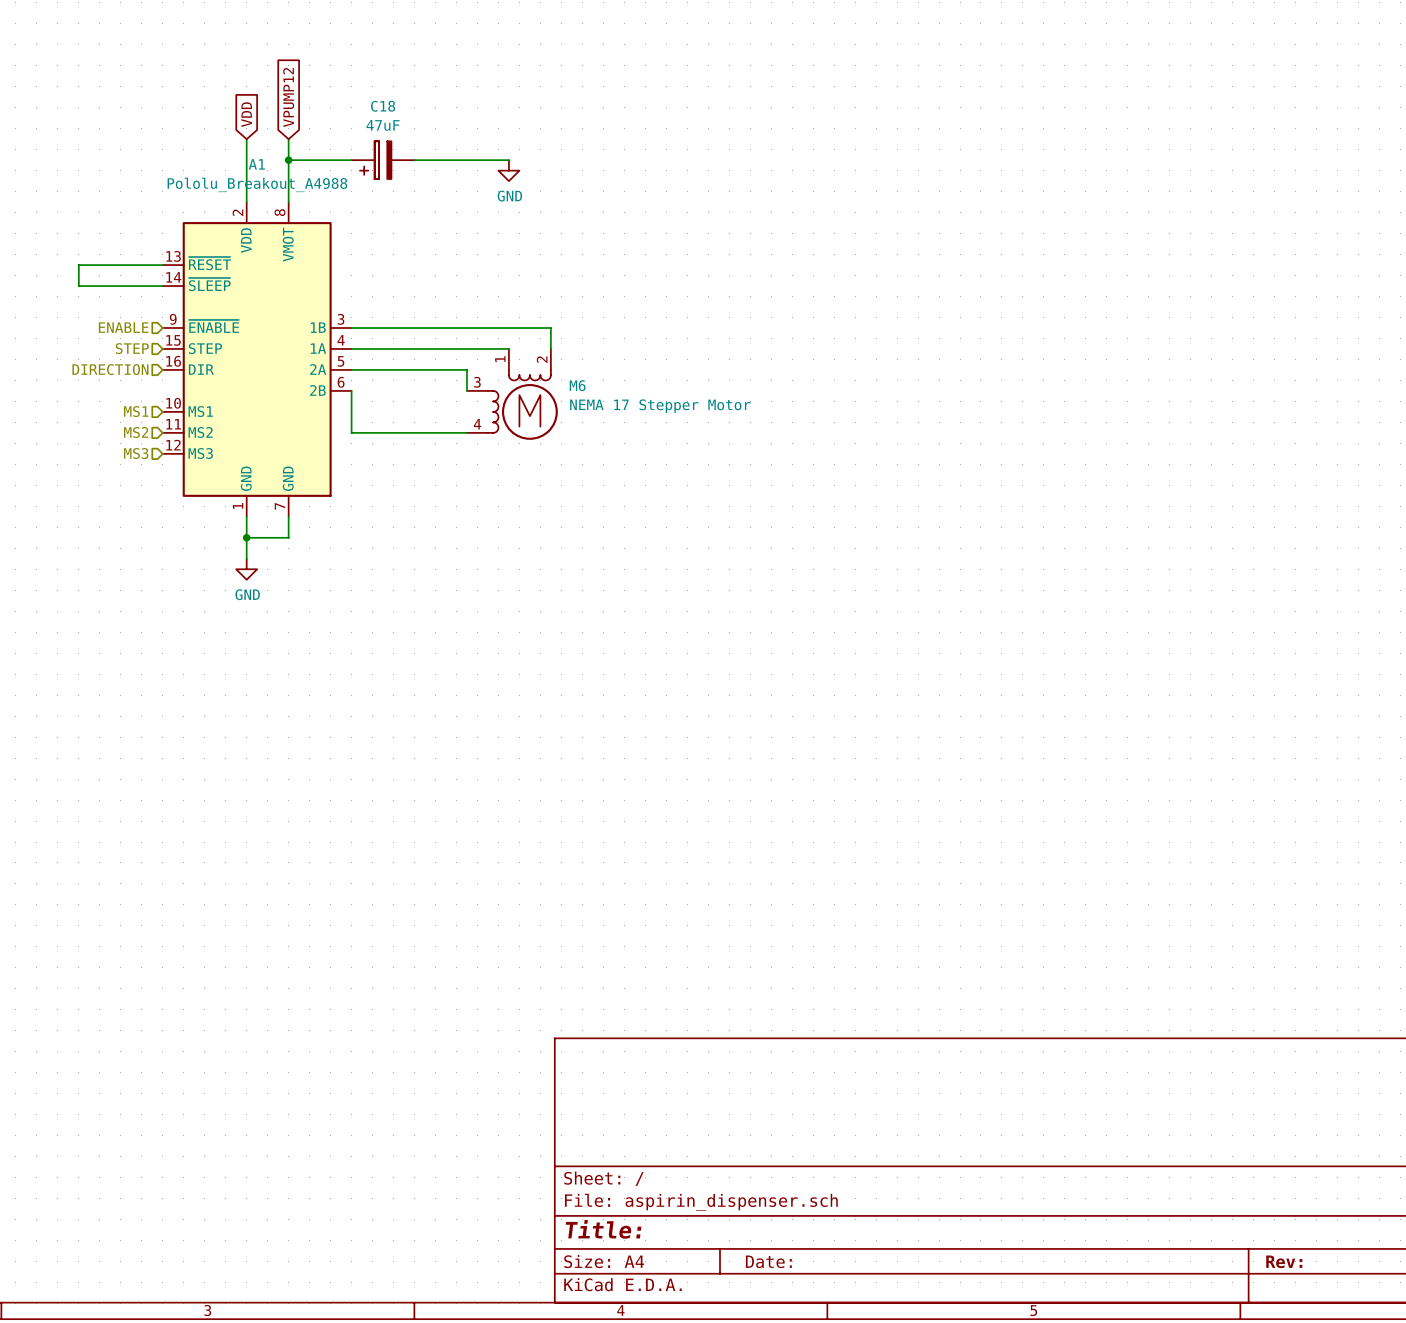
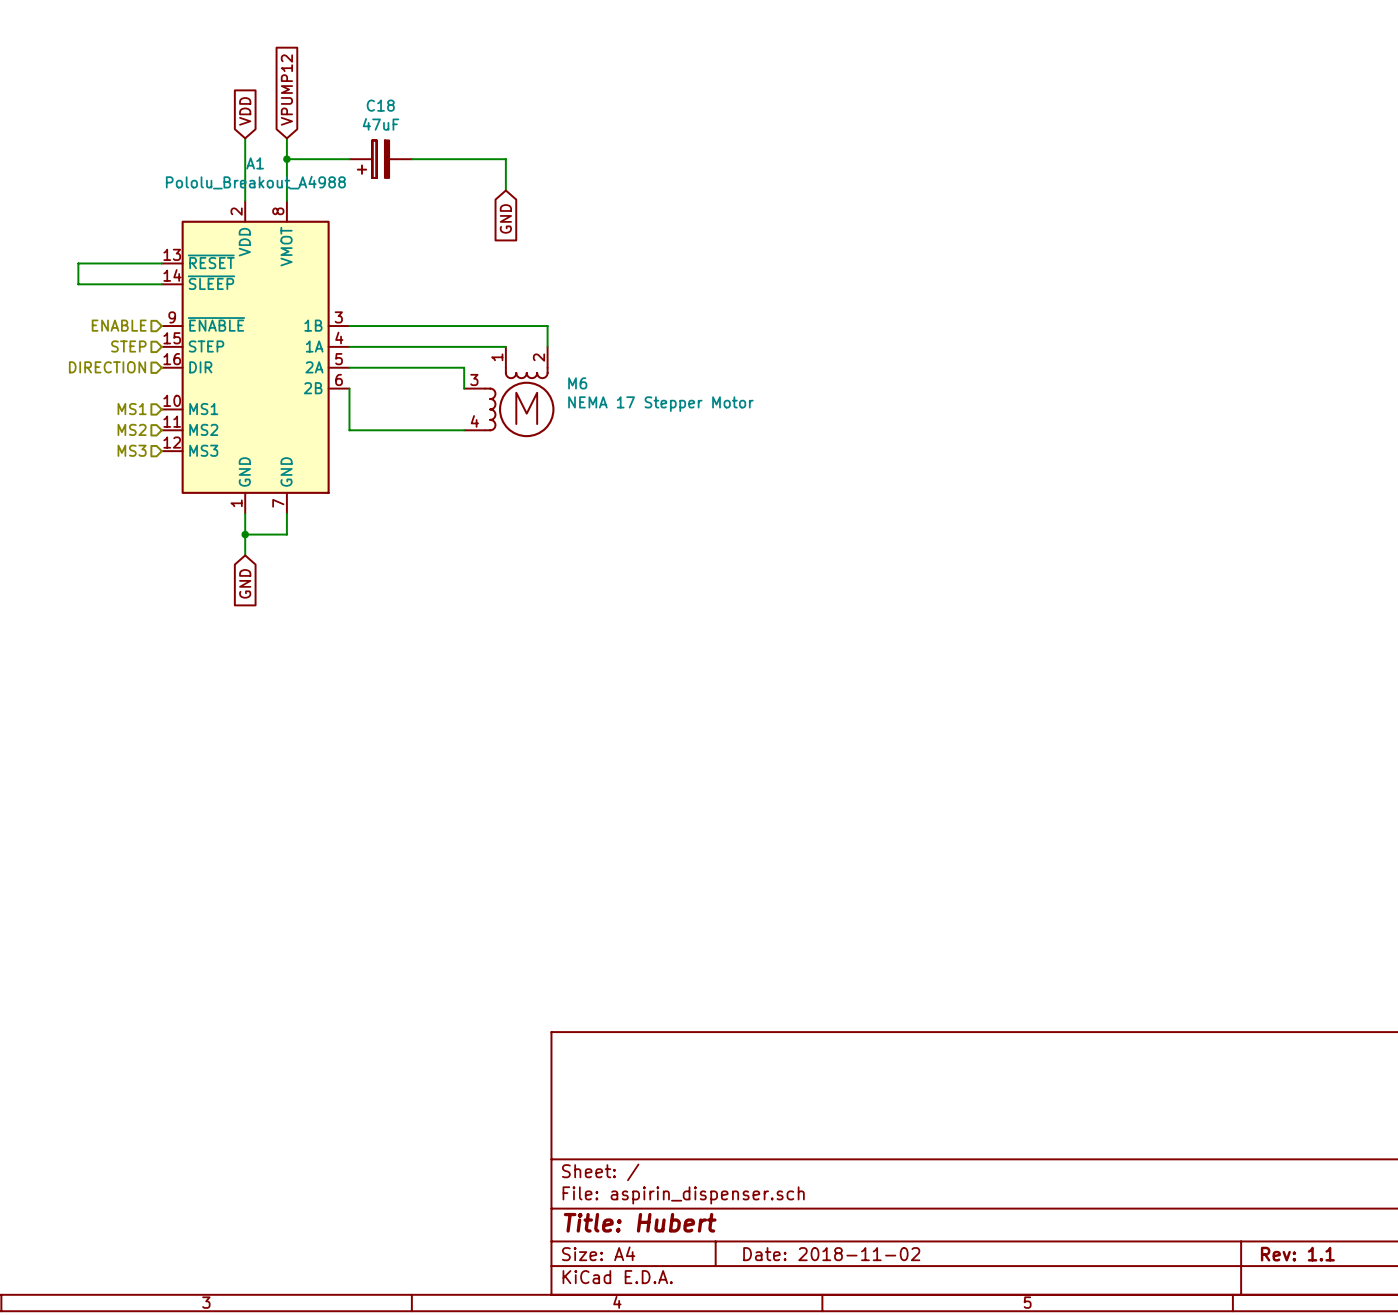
wire: none -> (505, 159) (505, 190)
power symbol: GND (508, 170) -> none
global label: none -> GND (505, 218)
power symbol: GND (246, 569) -> none
global label: none -> GND (245, 583)
title block: Title: (603, 1229) -> Title: Hubert (640, 1222)
title block: Date: (768, 1261) -> Date: 2018-11-02 (831, 1254)
title block: Rev: (1284, 1261) -> Rev: 1.1 (1297, 1254)

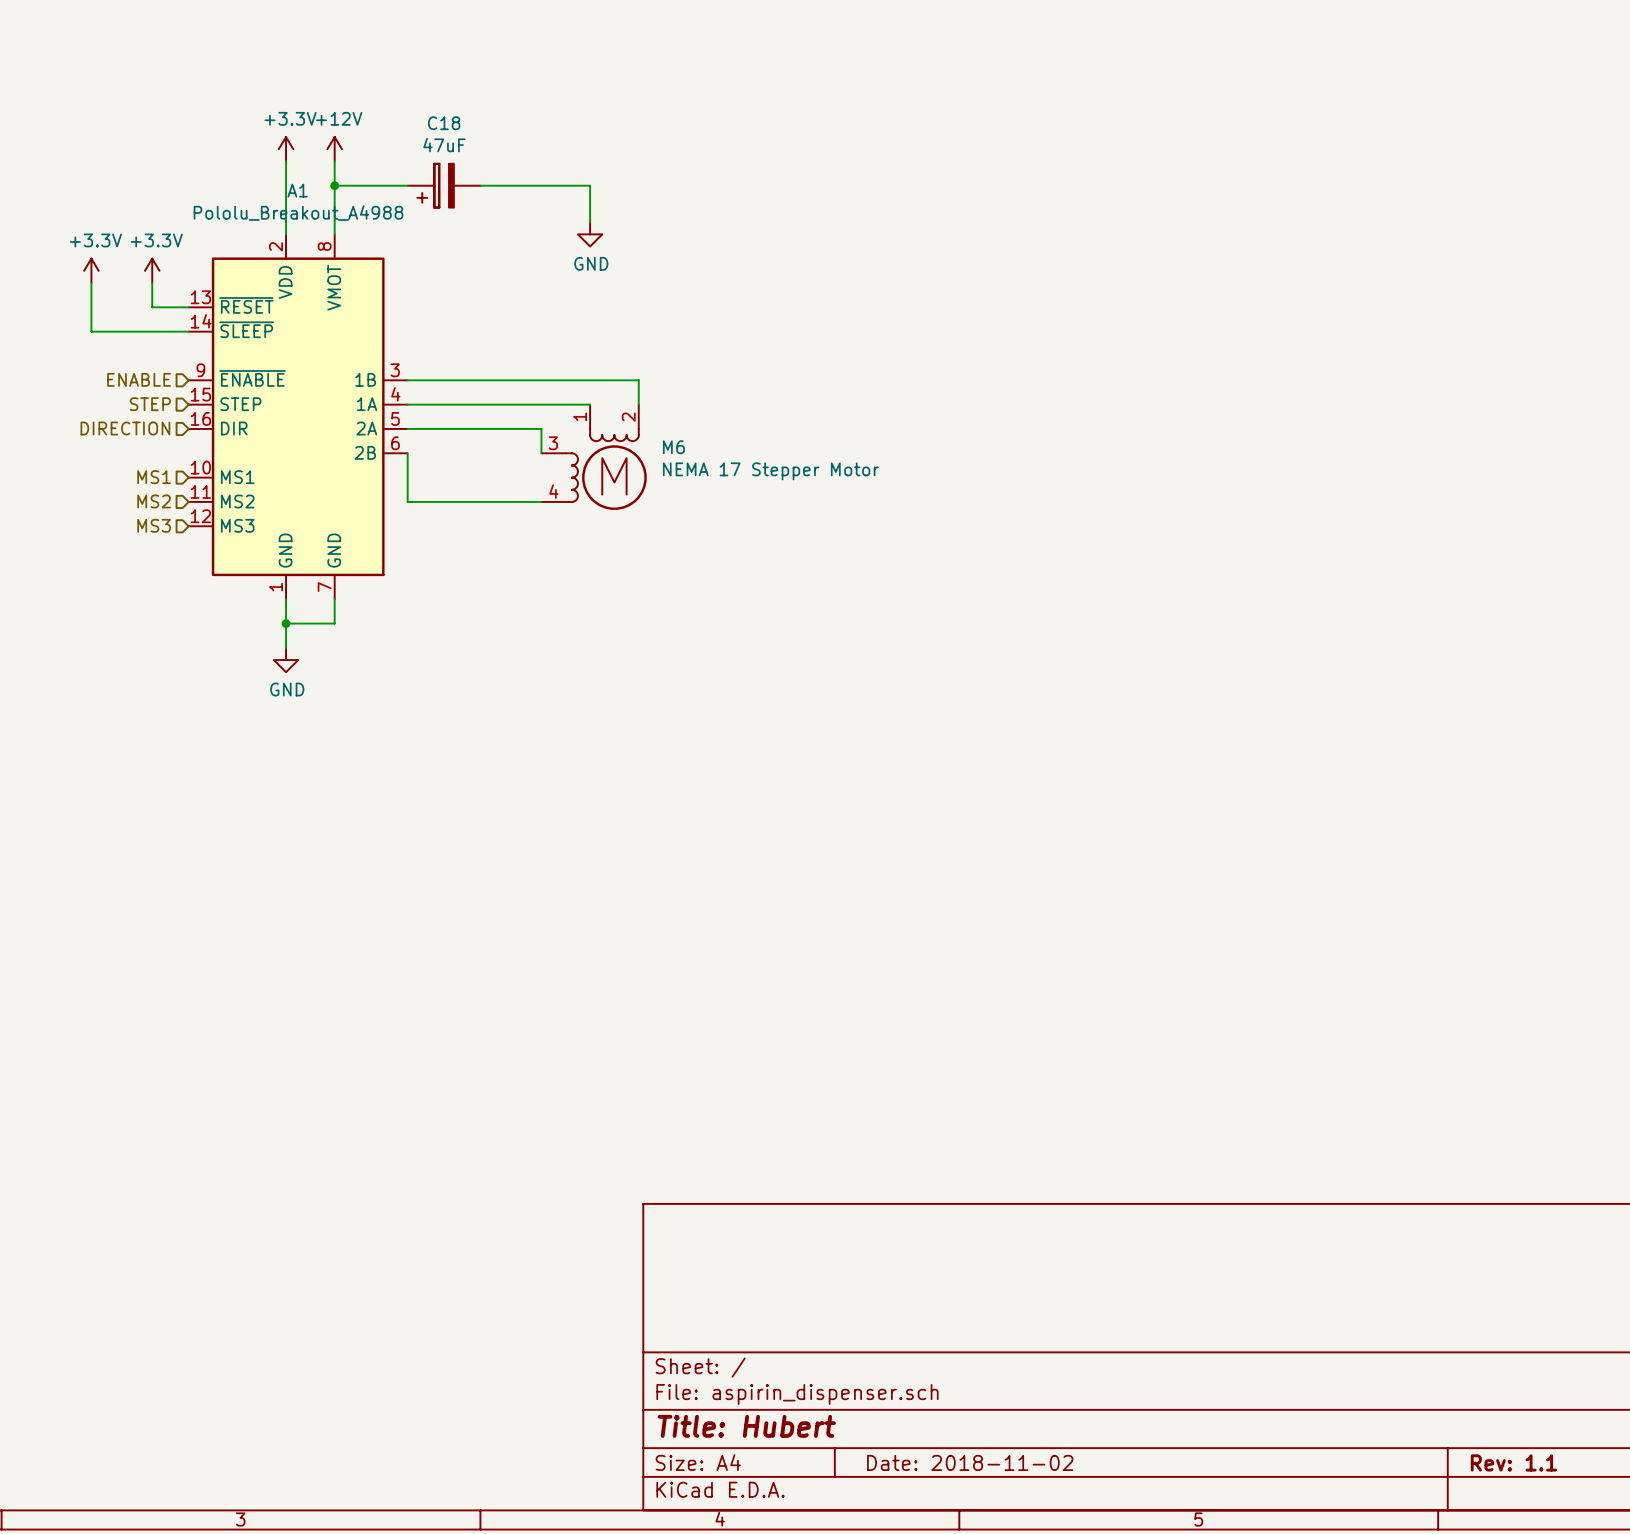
global label: VPUMP12 (286, 90) -> none
global label: VDD (245, 111) -> none
power symbol: none -> +3.3V (286, 149)
power symbol: none -> +12V (334, 149)
power symbol: none -> GND (590, 234)
global label: GND (505, 218) -> none
power symbol: none -> +3.3V (91, 270)
power symbol: none -> +3.3V (152, 270)
wire: none -> (152, 283) (152, 307)
wire: (78, 263) (130, 263) -> (91, 307) (91, 283)
power symbol: none -> GND (286, 660)
global label: GND (245, 583) -> none

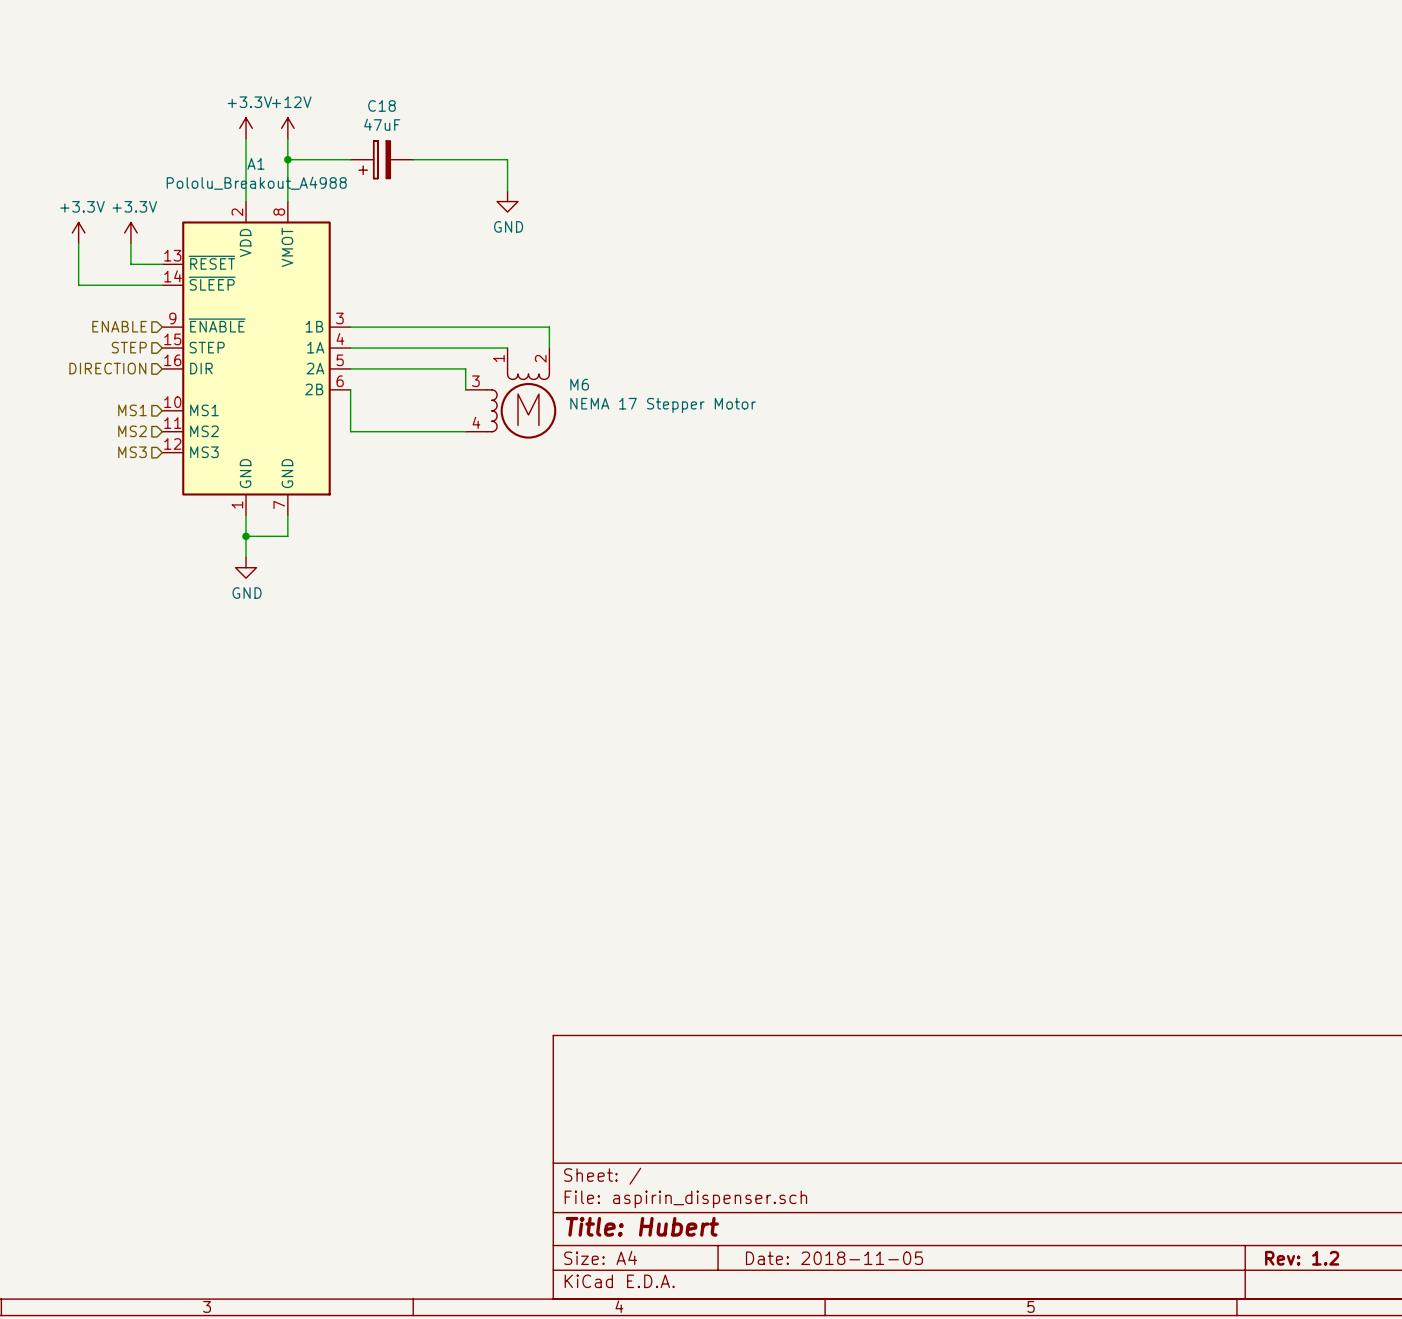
title block: Date: 2018-11-02 (970, 1462) -> Date: 2018-11-05 (834, 1258)
title block: Rev: 1.1 (1513, 1462) -> Rev: 1.2 (1302, 1258)

